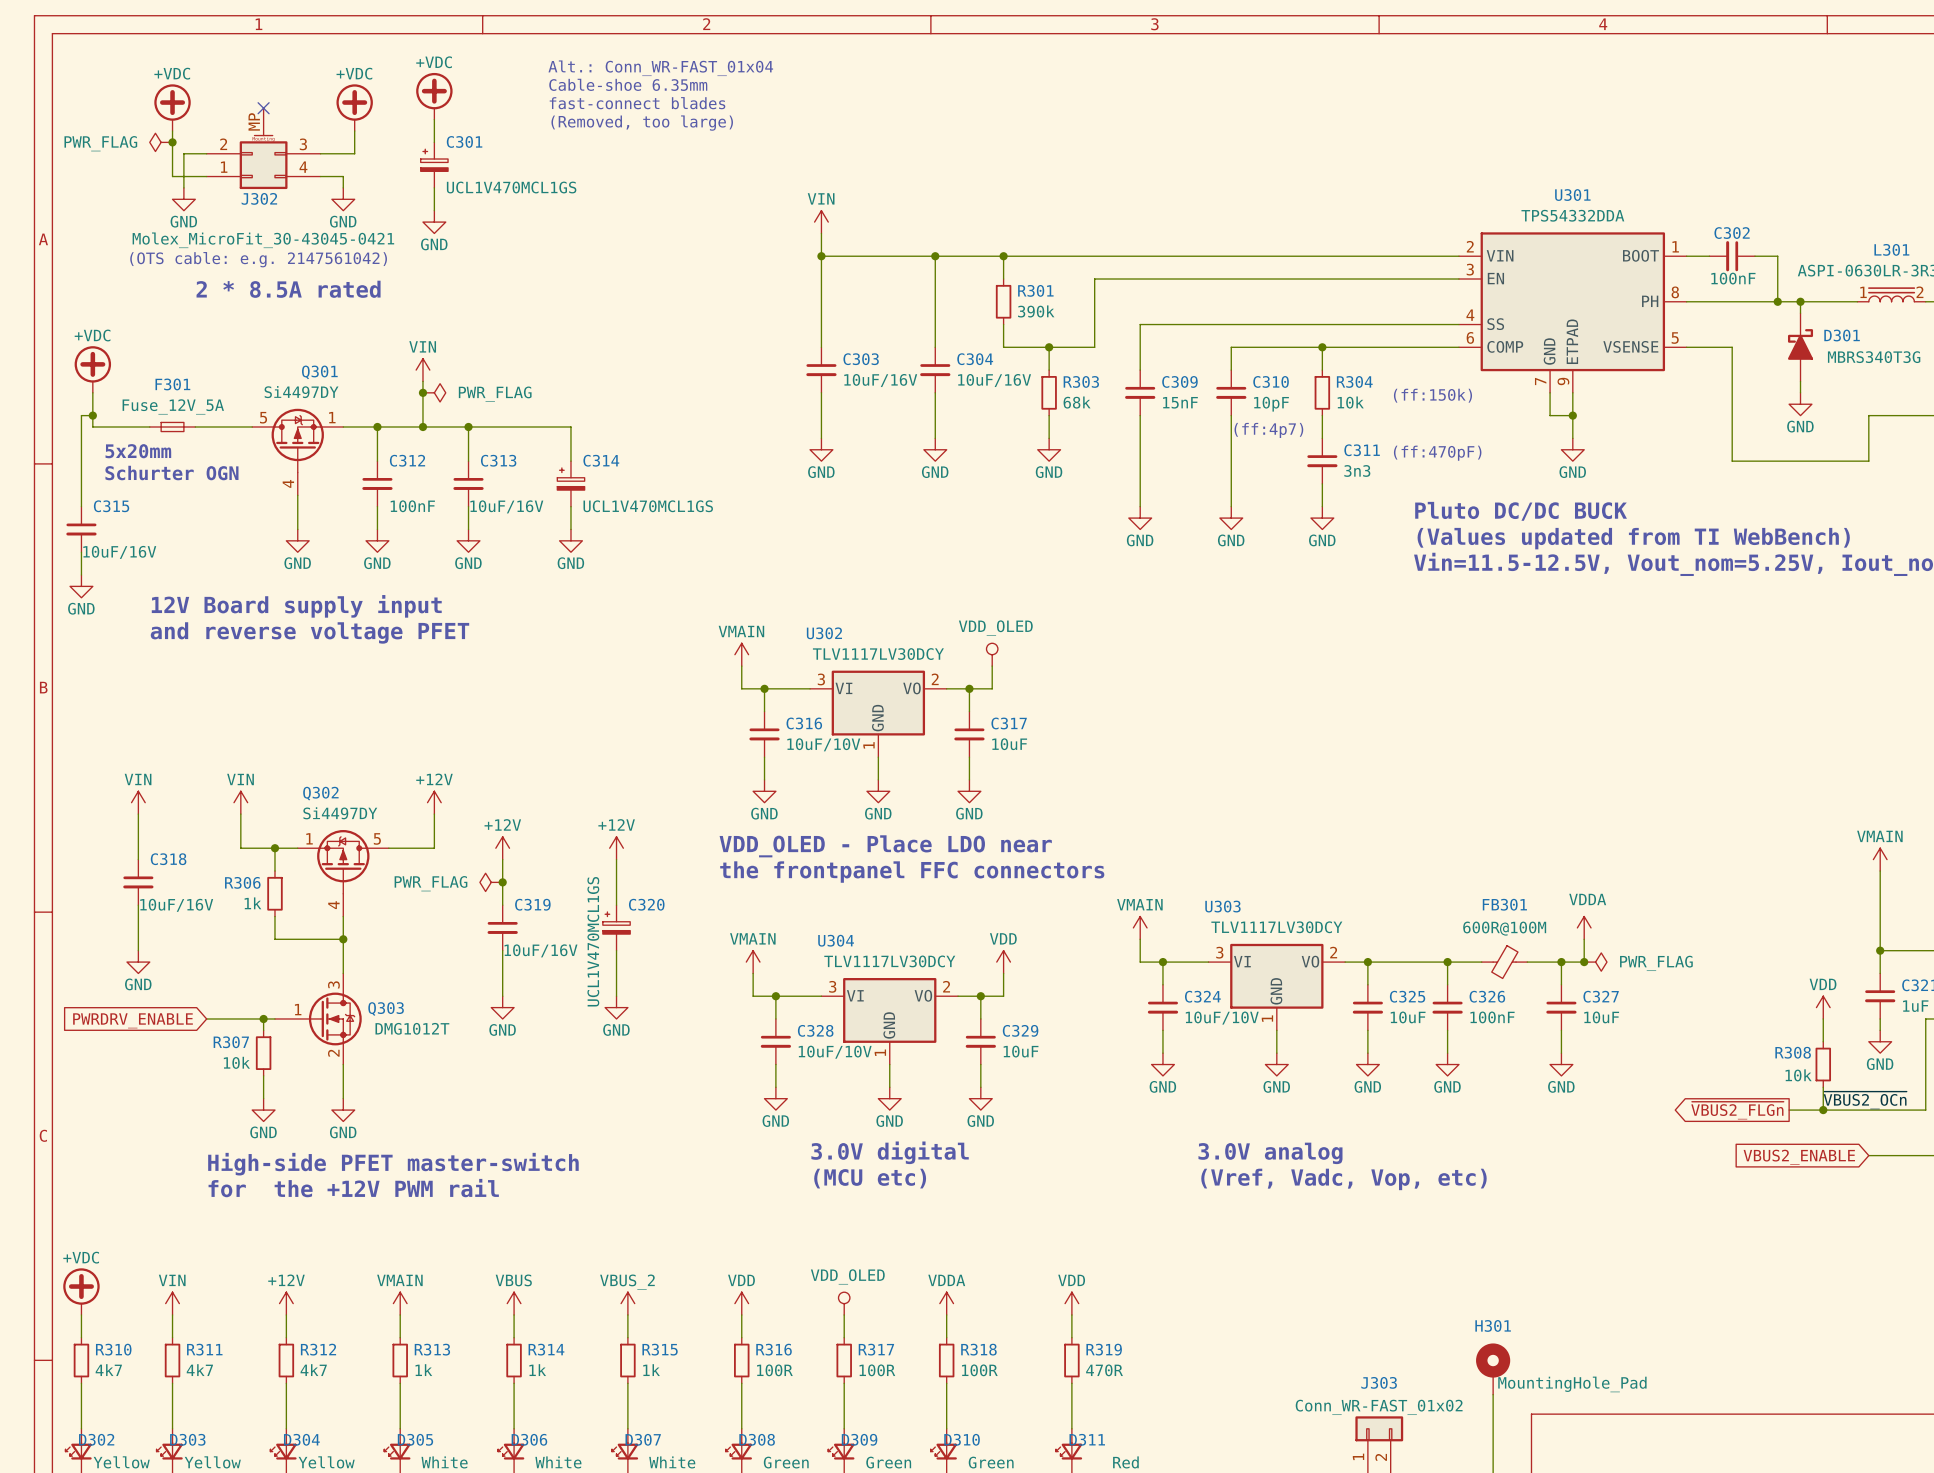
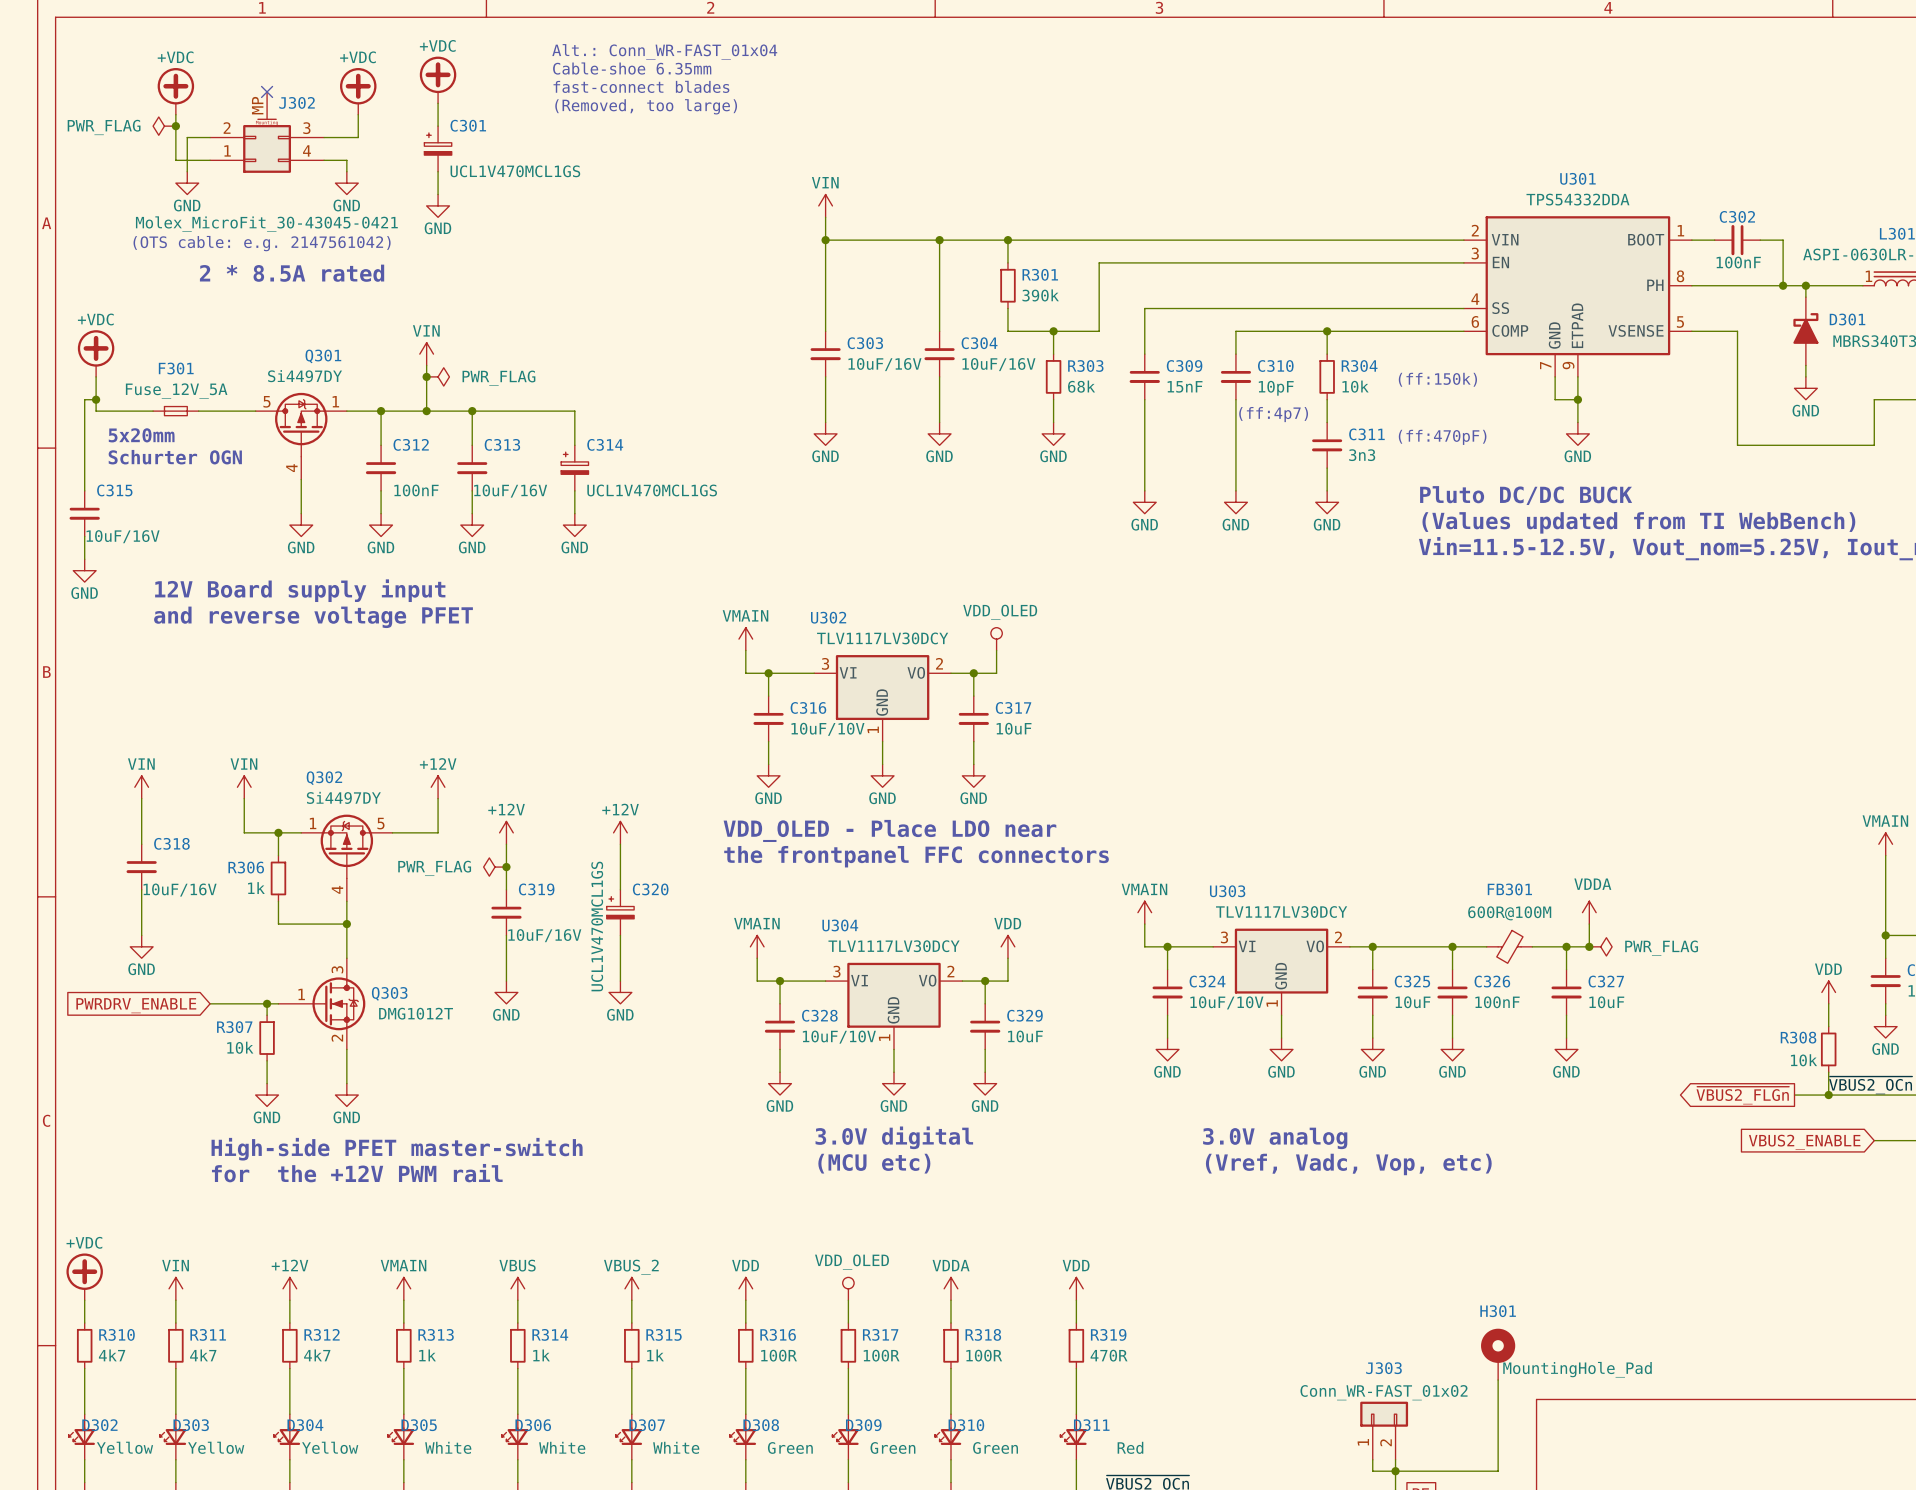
J302 name position: J302 (259, 198) -> J302 (297, 102)

